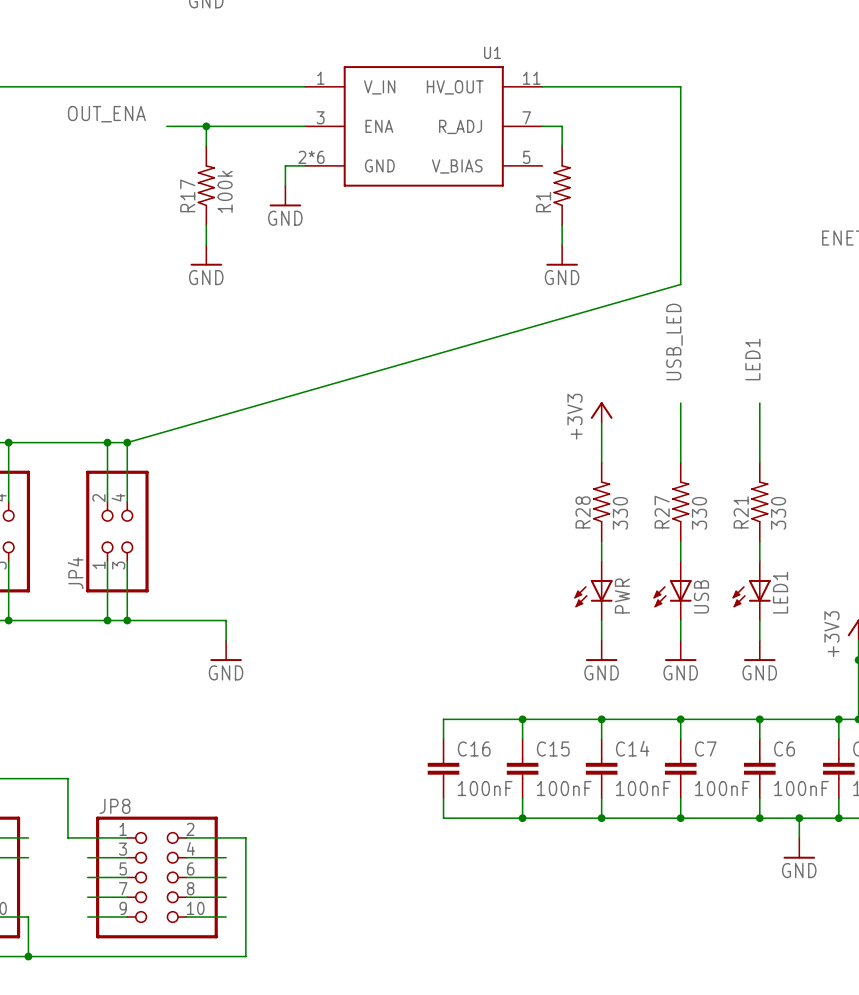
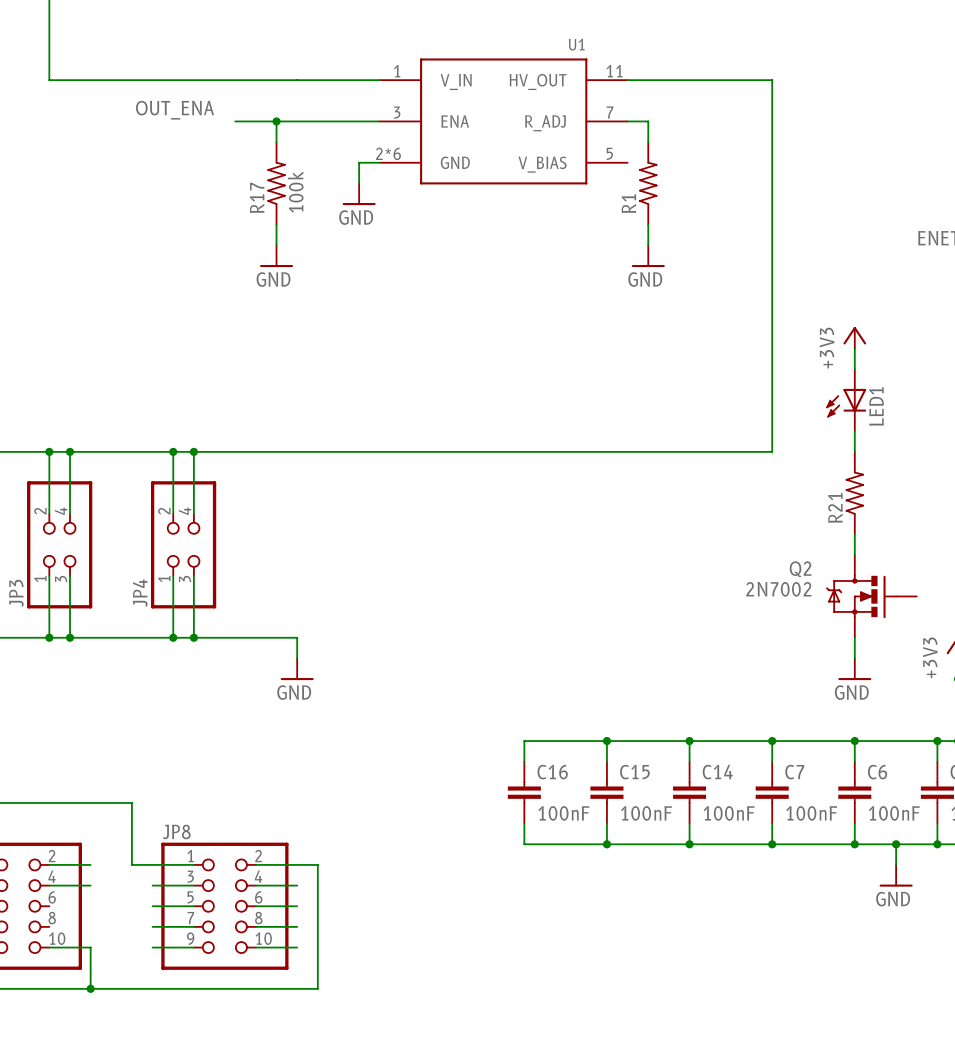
wire: (680, 284) (127, 442) -> (772, 451) (193, 451)
wire: none -> (772, 286) (772, 410)
label: USB_LED (674, 341) -> none
label: LED1 (752, 359) -> none
power symbol position: +3V3 (601, 412) -> +3V3 (854, 337)
wire: (601, 422) (601, 462) -> none
wire: (680, 442) (680, 462) -> (854, 348) (854, 369)
R28: 330 (601, 501) -> none
R27: 330 (680, 501) -> none
R21 position: (759, 501) -> (854, 493)
R21 value: 330 (778, 513) -> none
wire: (601, 541) (601, 561) -> none
wire: (680, 541) (680, 561) -> none
Q2: none -> 2N7002 (871, 596)
PWR: (593, 590) -> none
USB: (672, 590) -> none
LED1 position: (751, 590) -> (846, 400)
wire: (601, 620) (601, 640) -> none
wire: (680, 620) (680, 640) -> none
power symbol: GND (601, 650) -> none
power symbol: GND (680, 650) -> none

